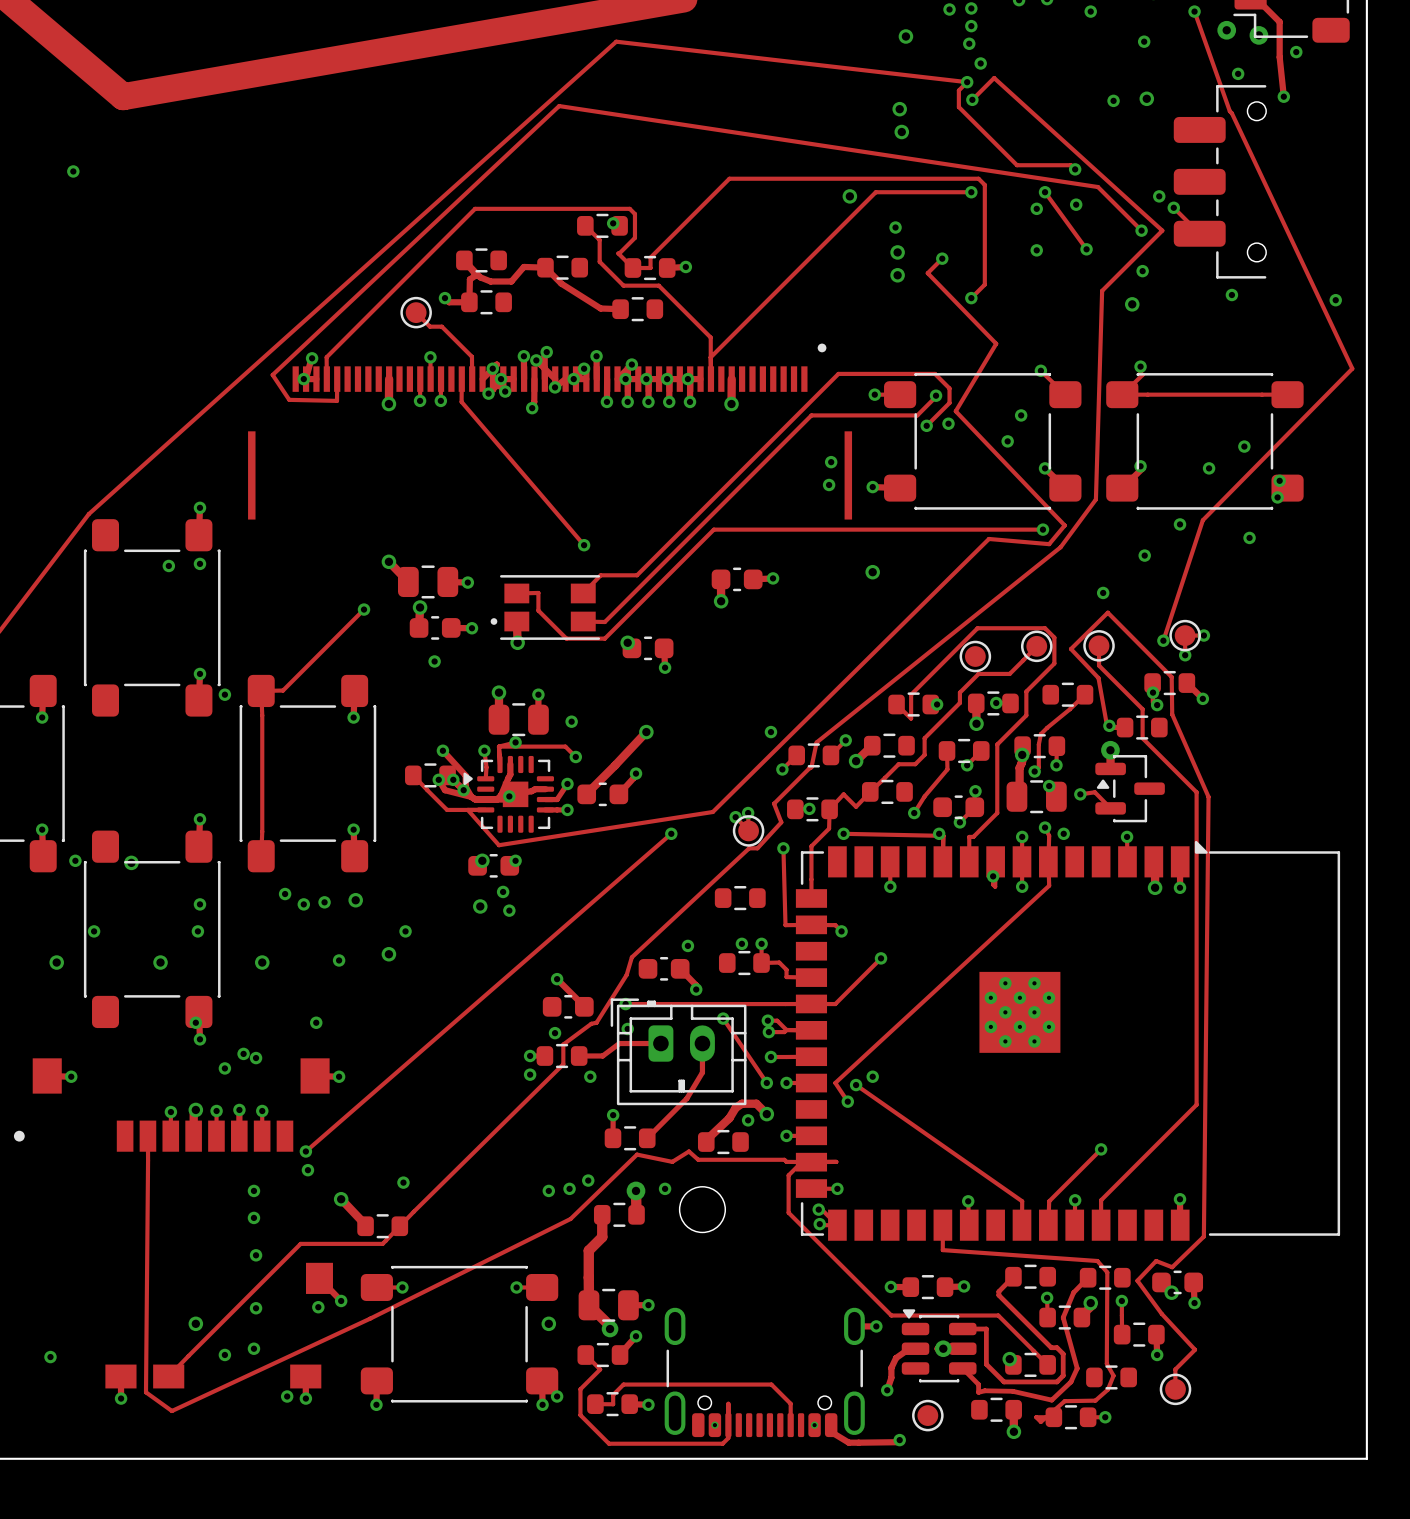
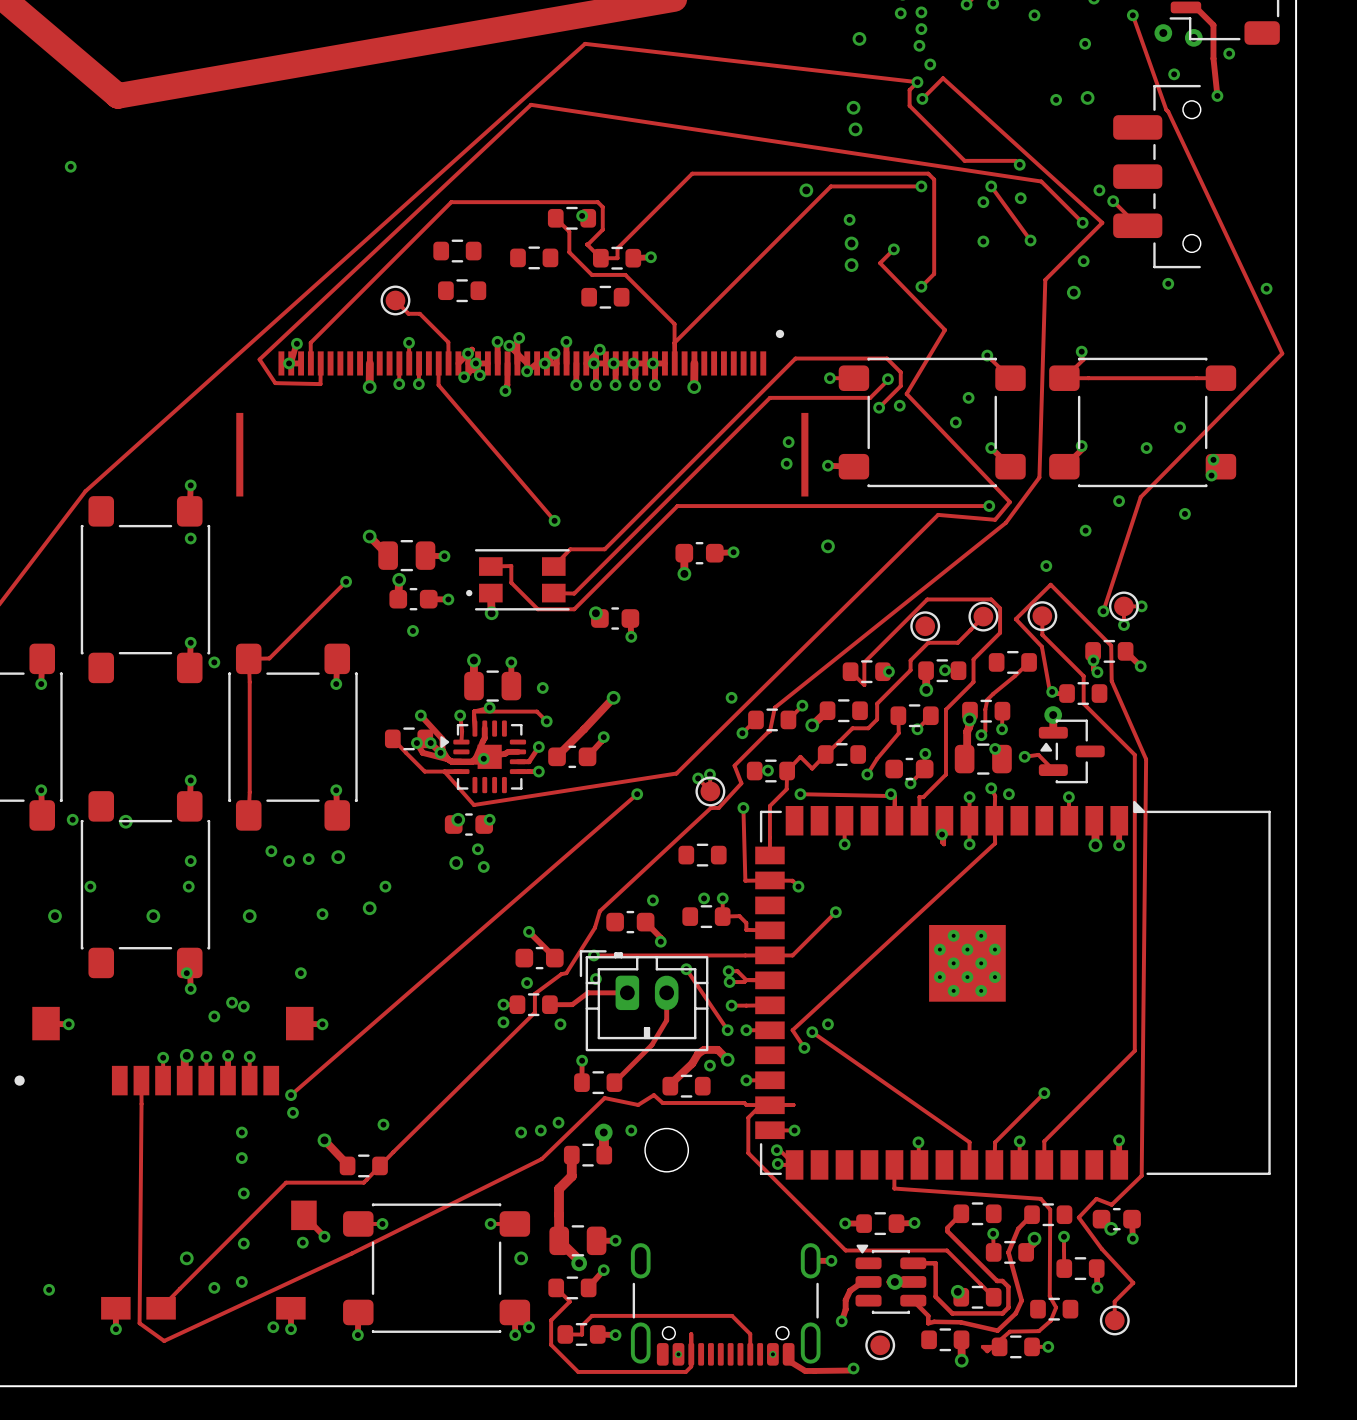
track: (464, 260) (480, 277) (490, 281) (511, 281) (523, 266) (545, 267) (561, 283) (600, 308) (620, 309) -> none
track: (468, 265) (476, 275) (469, 279) (469, 302) (449, 302) (444, 298) -> none
via: (444, 298) -> none
via: (168, 565) -> none

